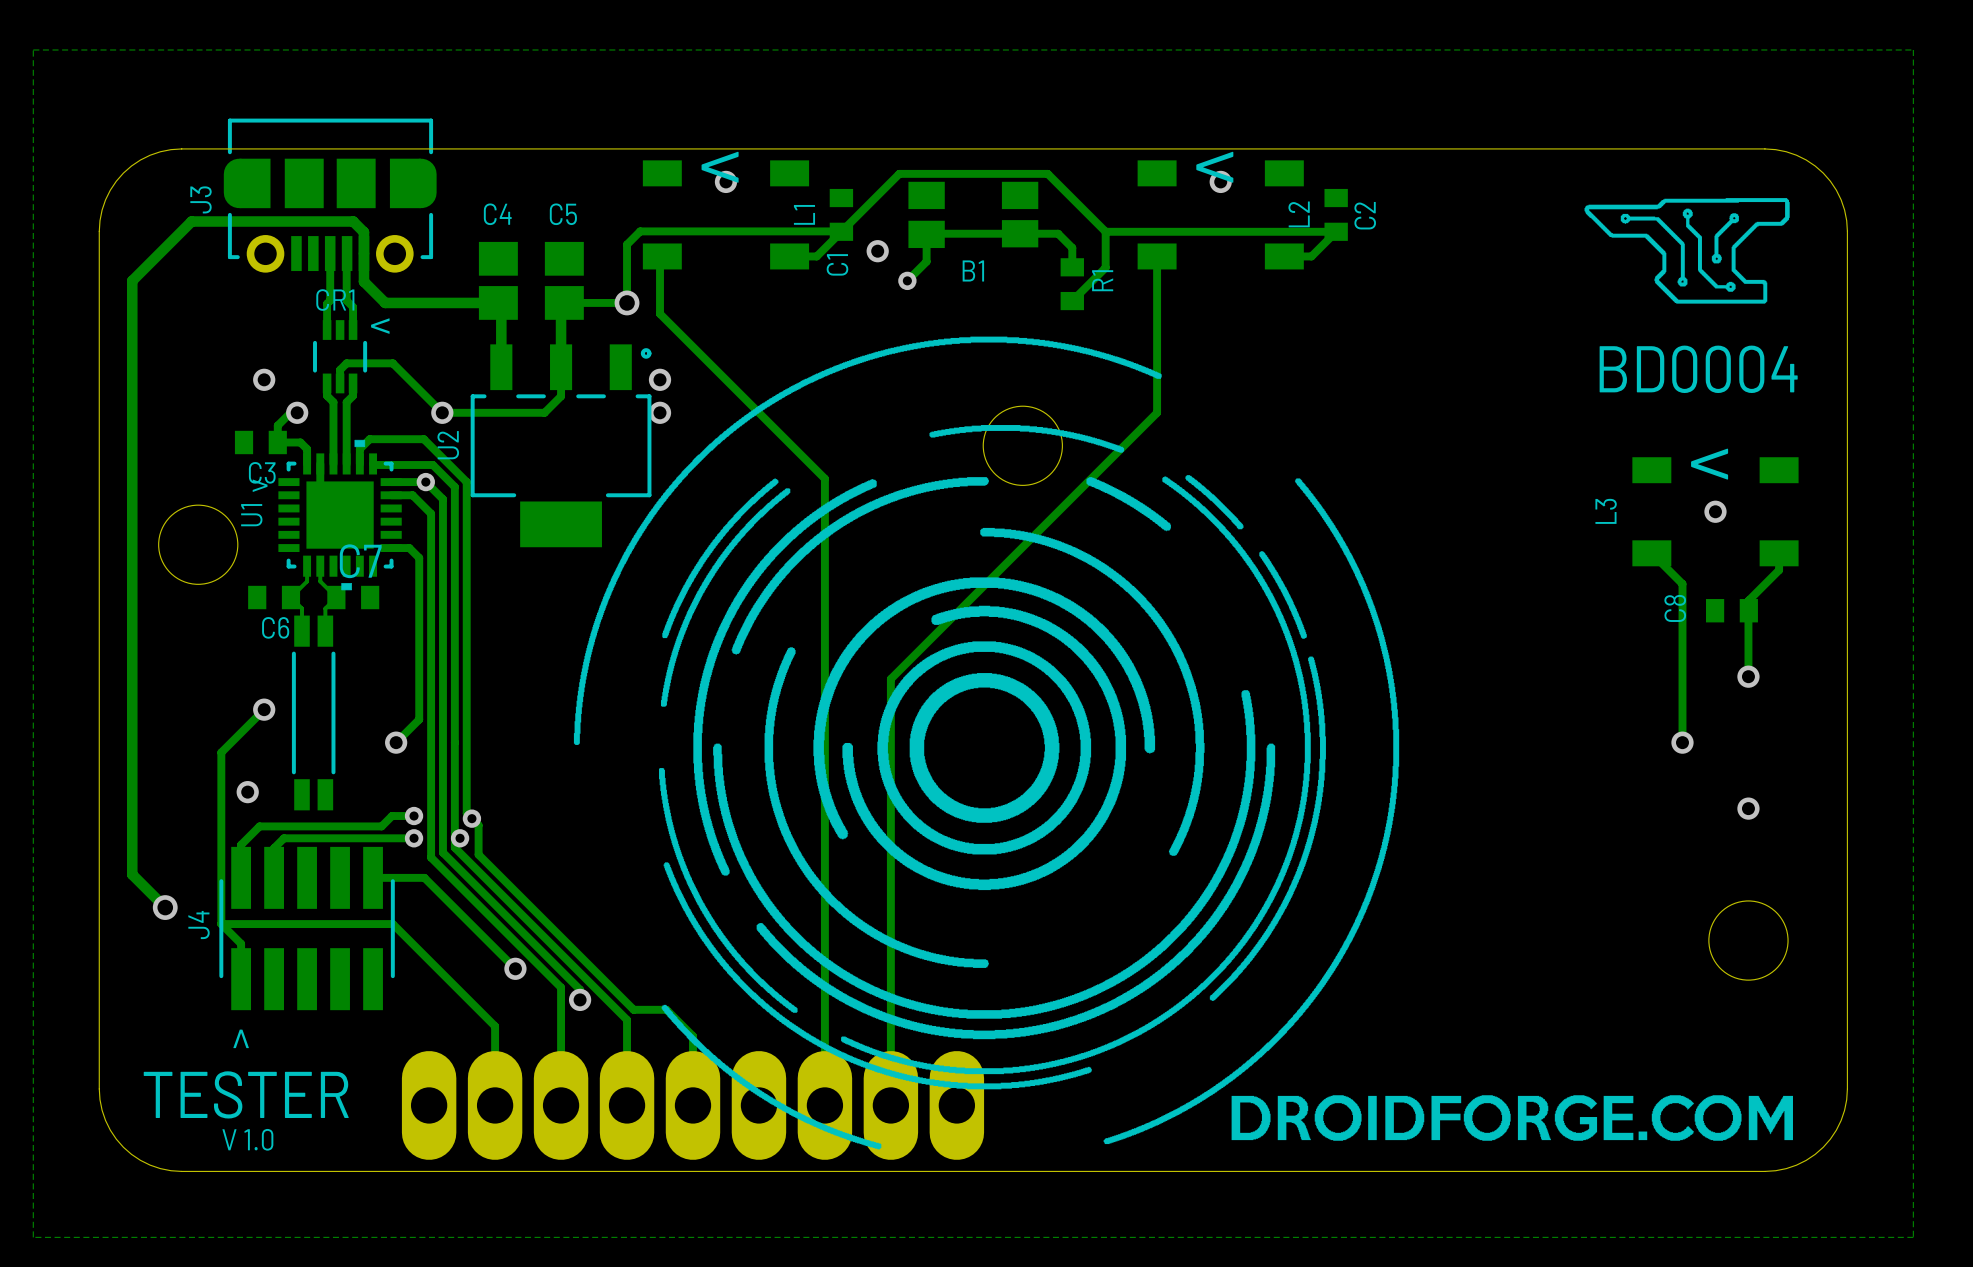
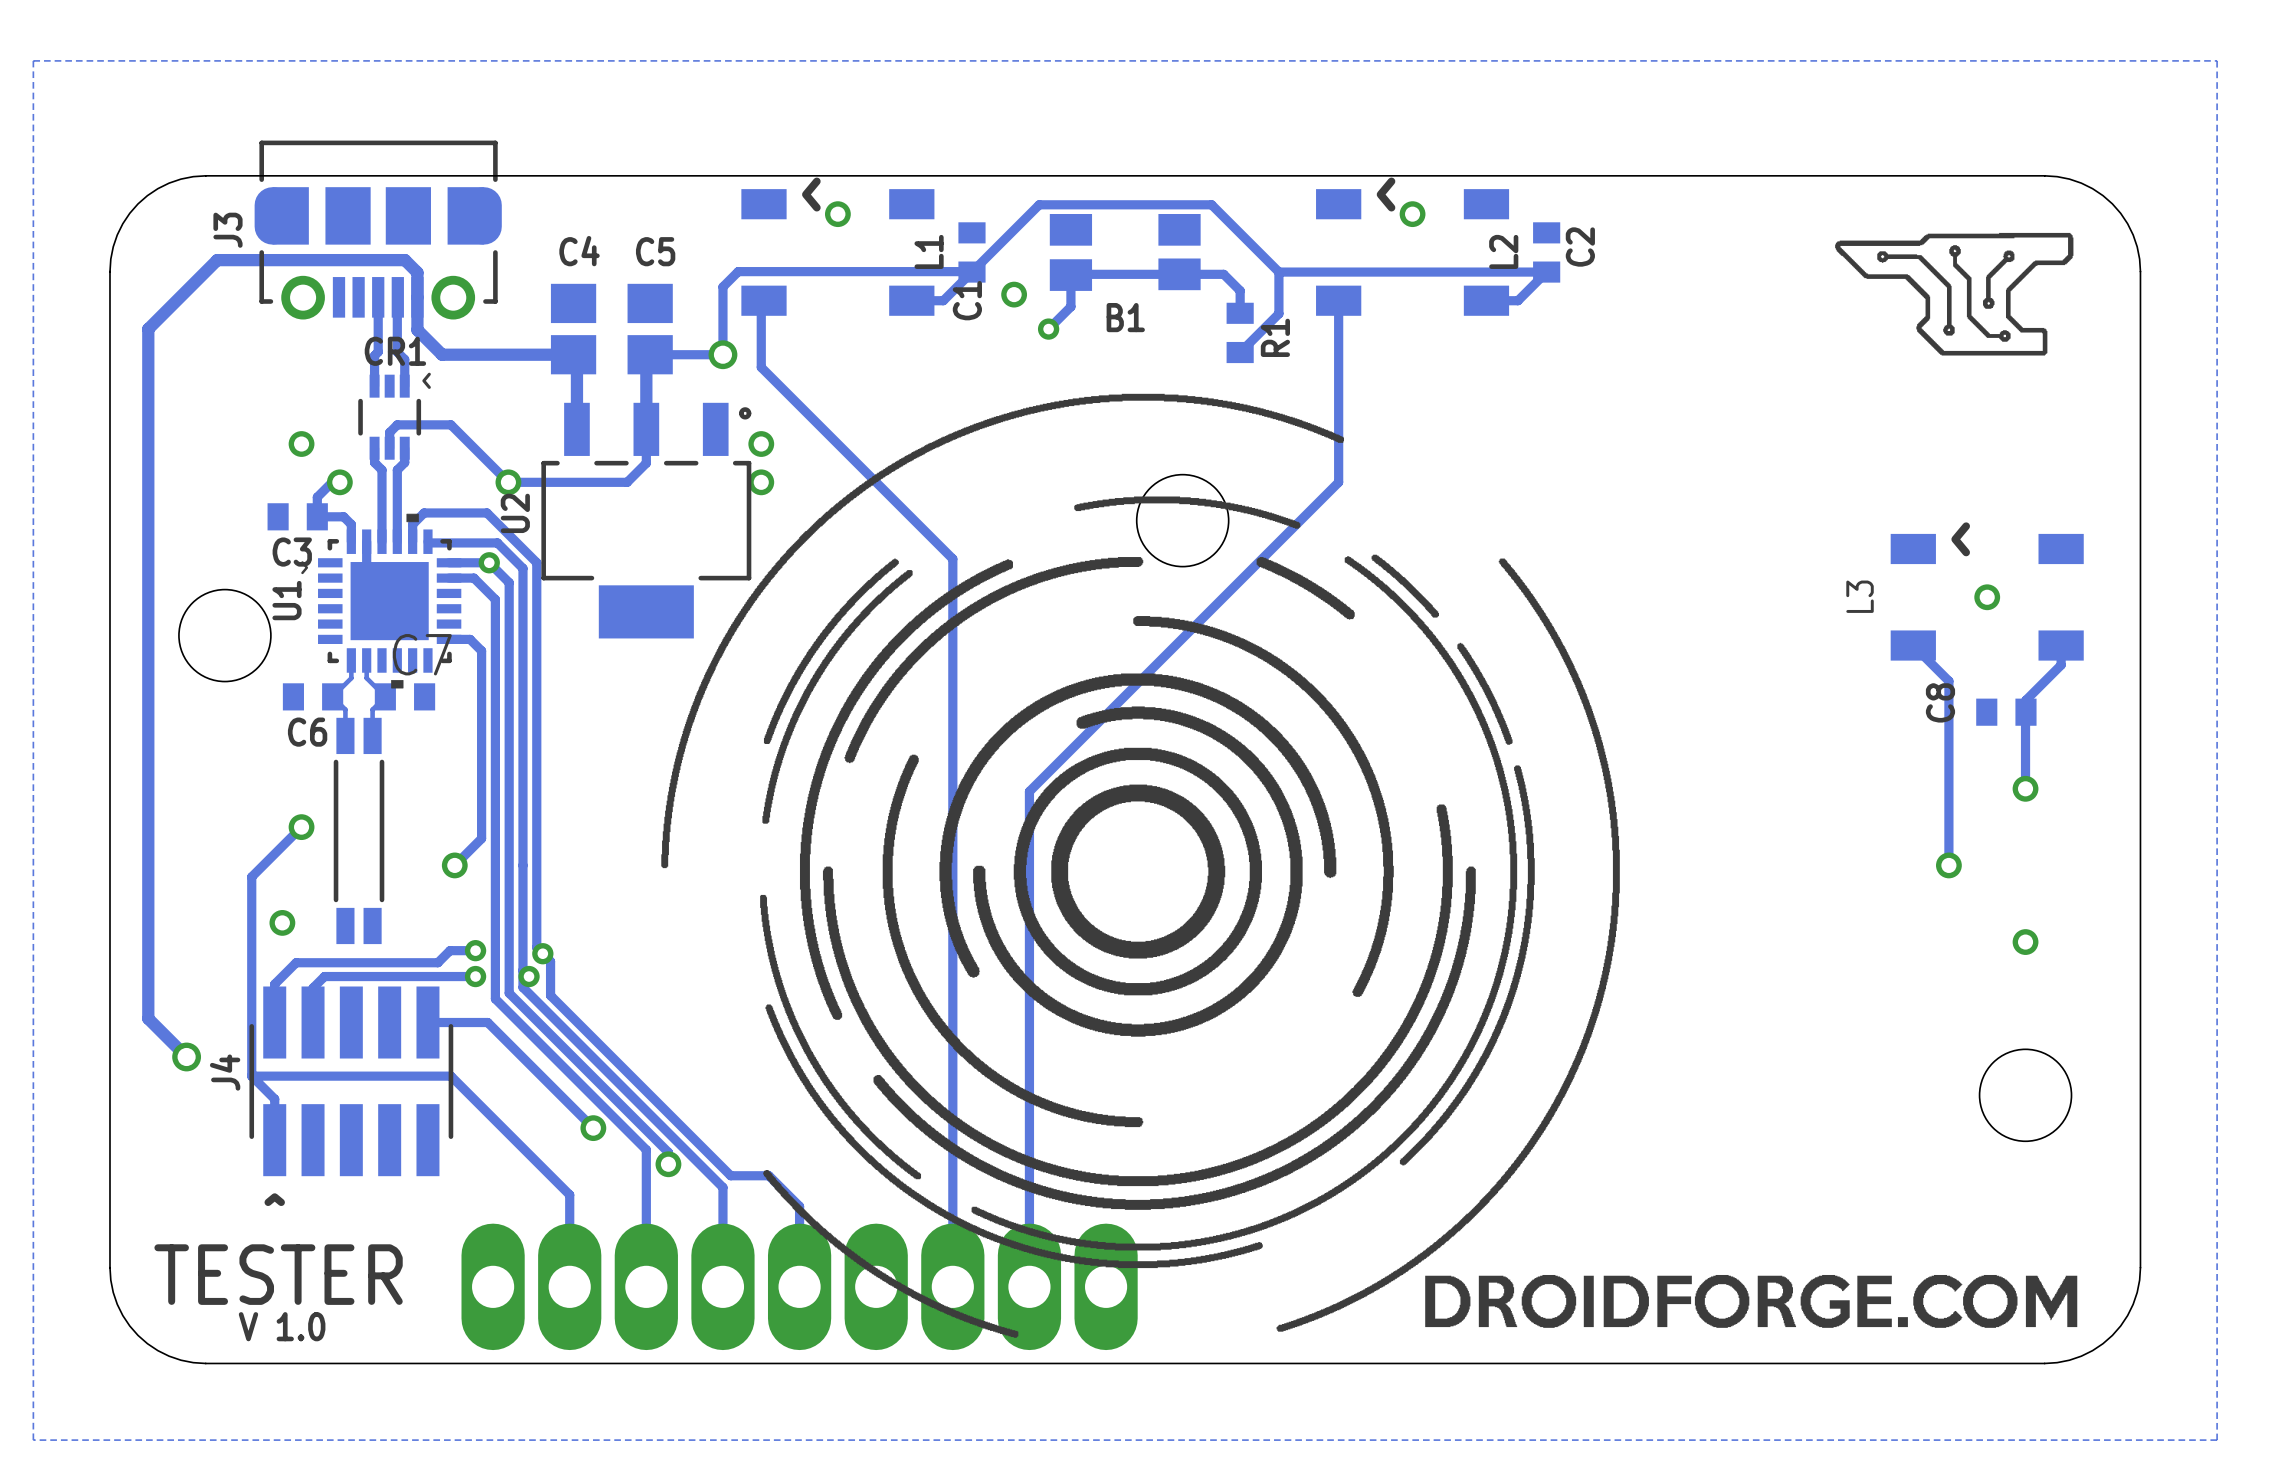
text: BD0004 (1698, 369) -> none

